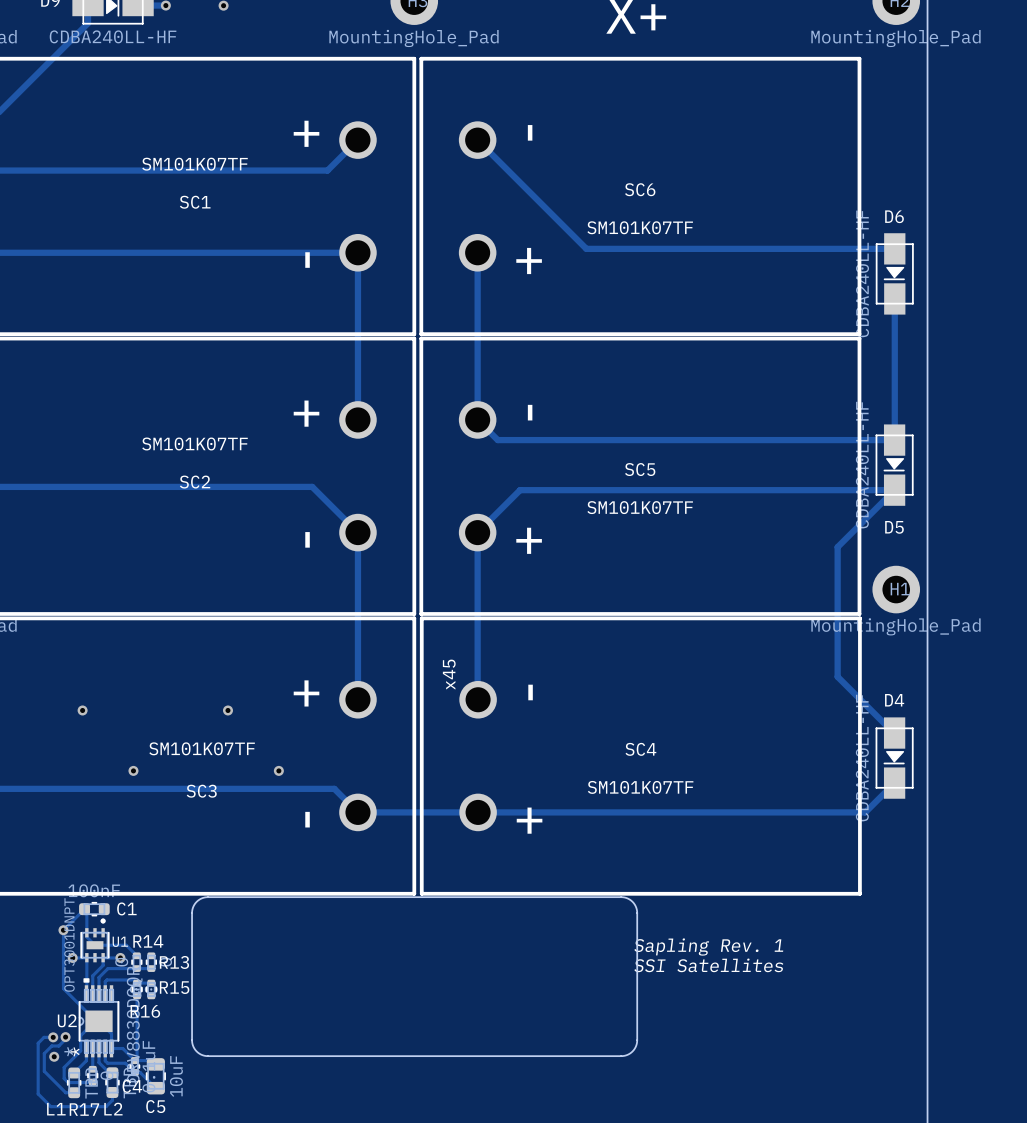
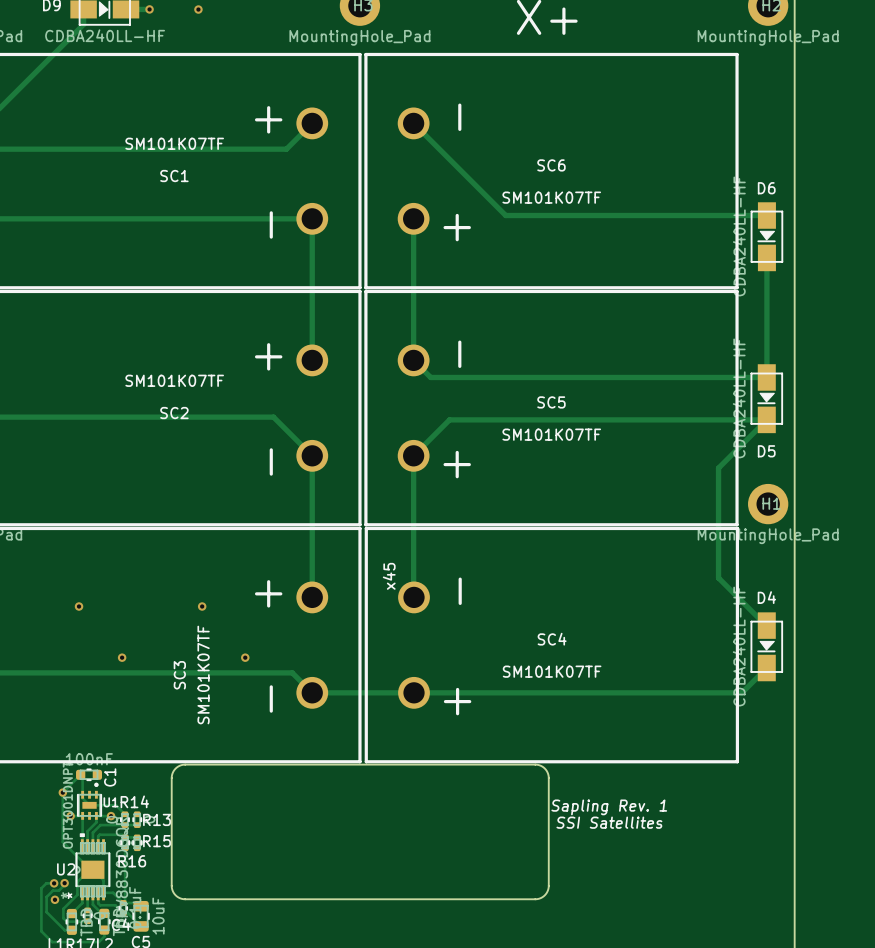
SC3 value rotation: 0° (202, 748) -> 90° counterclockwise (203, 675)
SC3 name rotation: 0° (201, 791) -> 90° counterclockwise (179, 675)
C1 name rotation: 0° (126, 908) -> 90° counterclockwise (110, 777)

